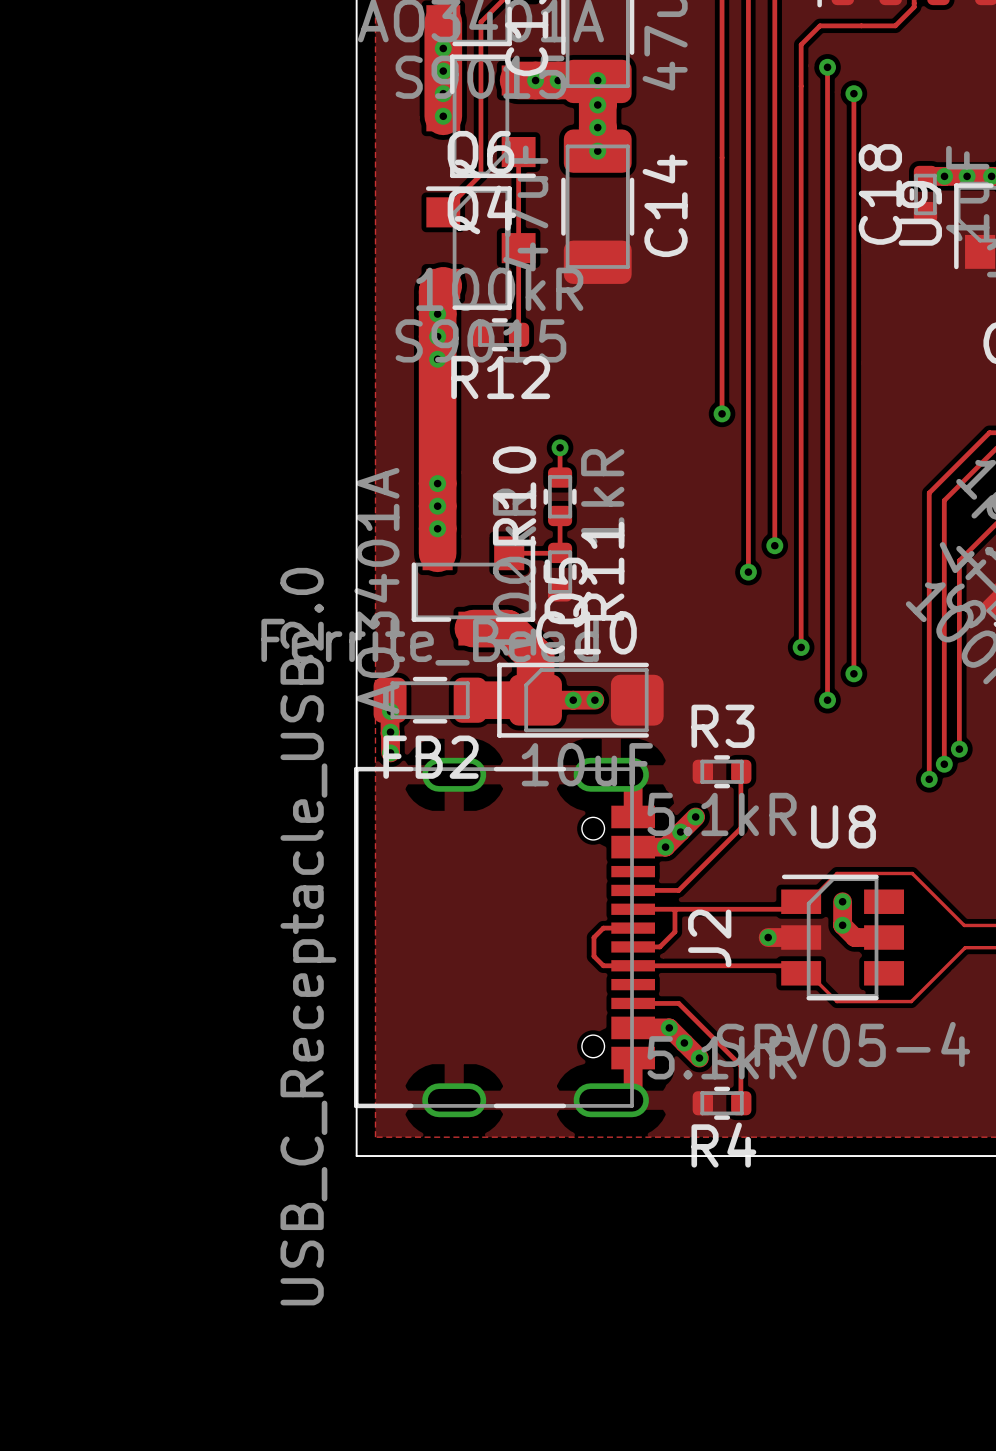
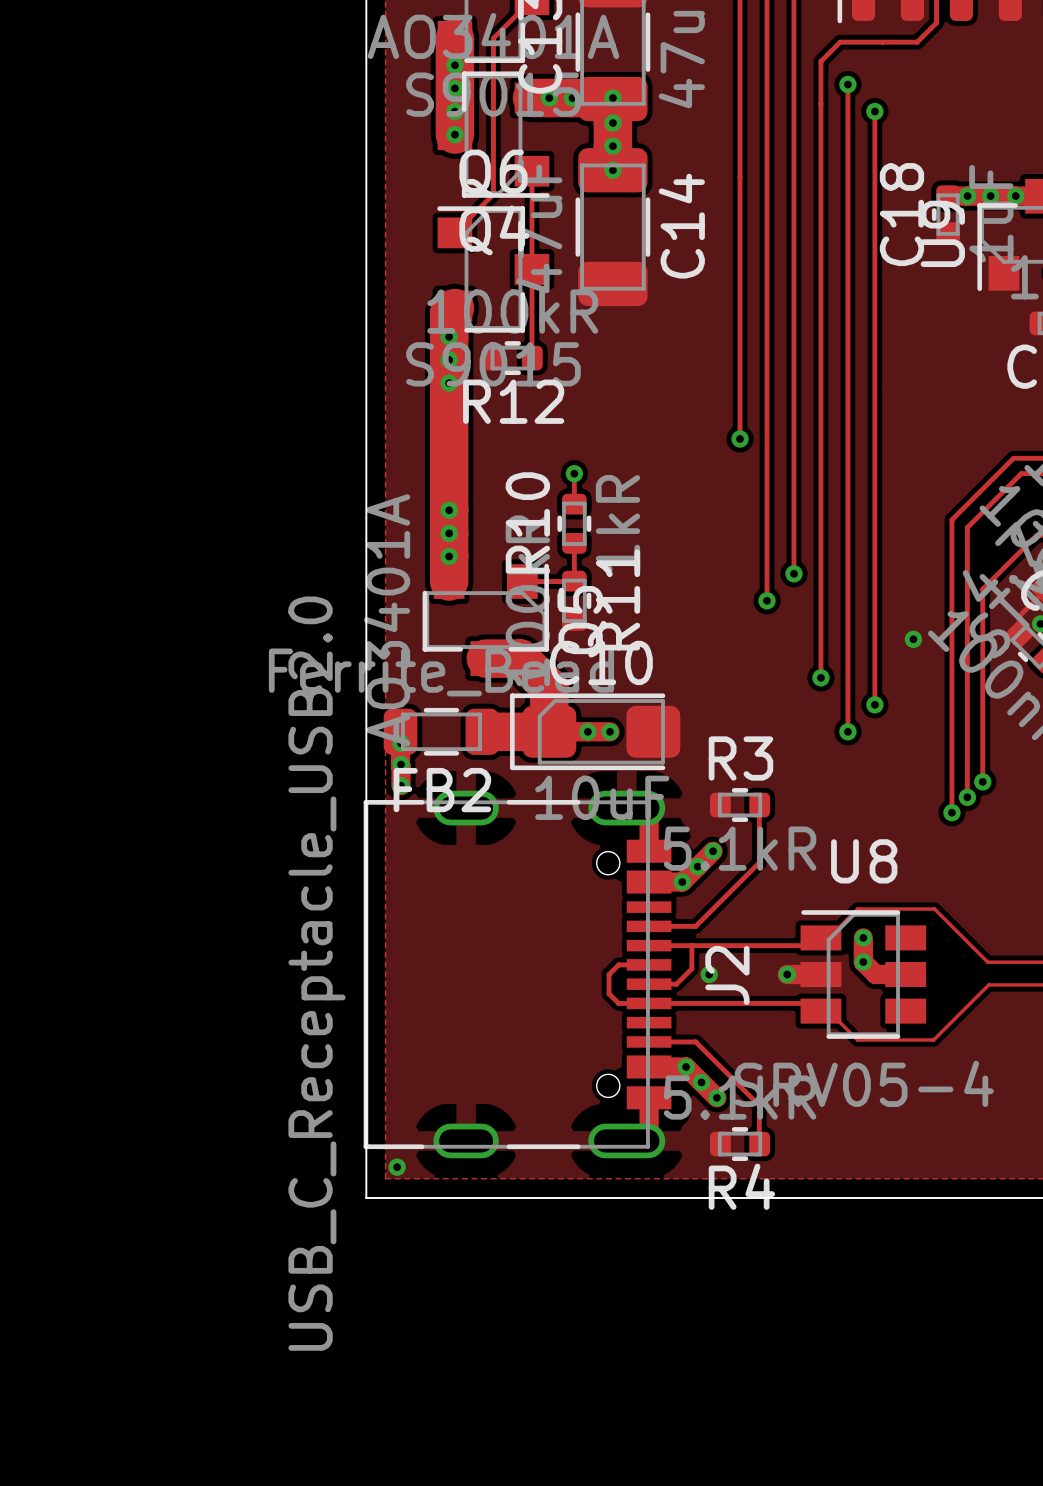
via: none -> (913, 639)
via: none -> (709, 974)
via: none -> (397, 1167)

